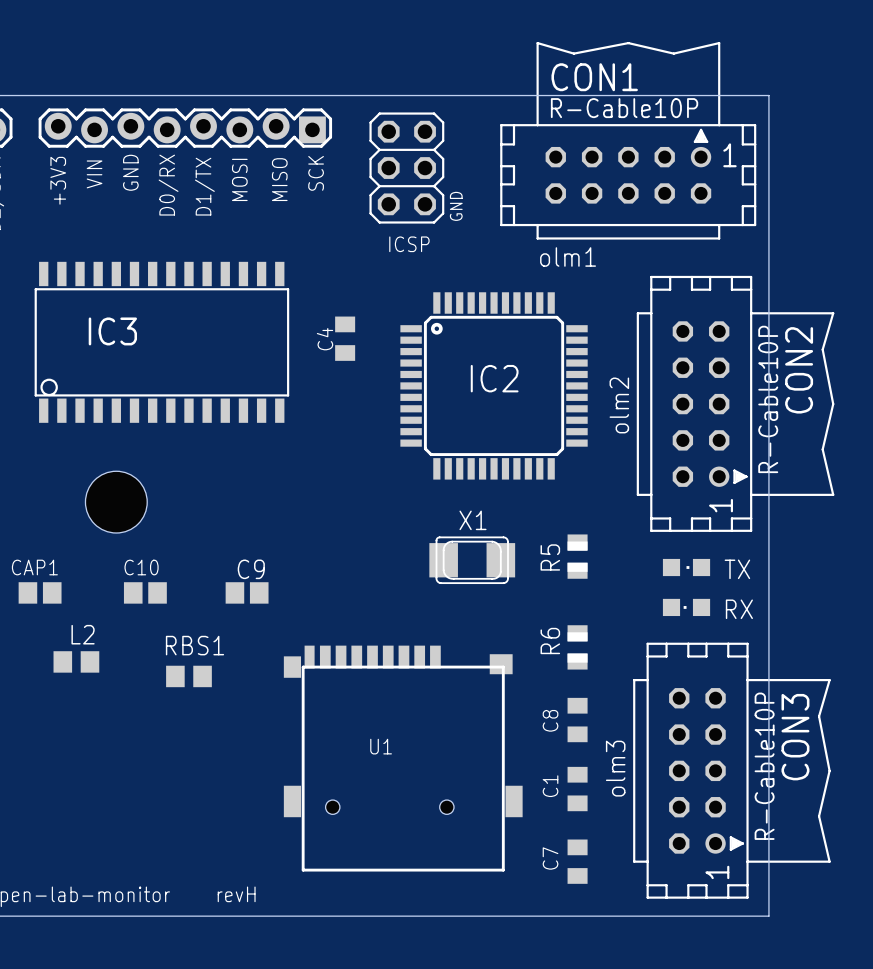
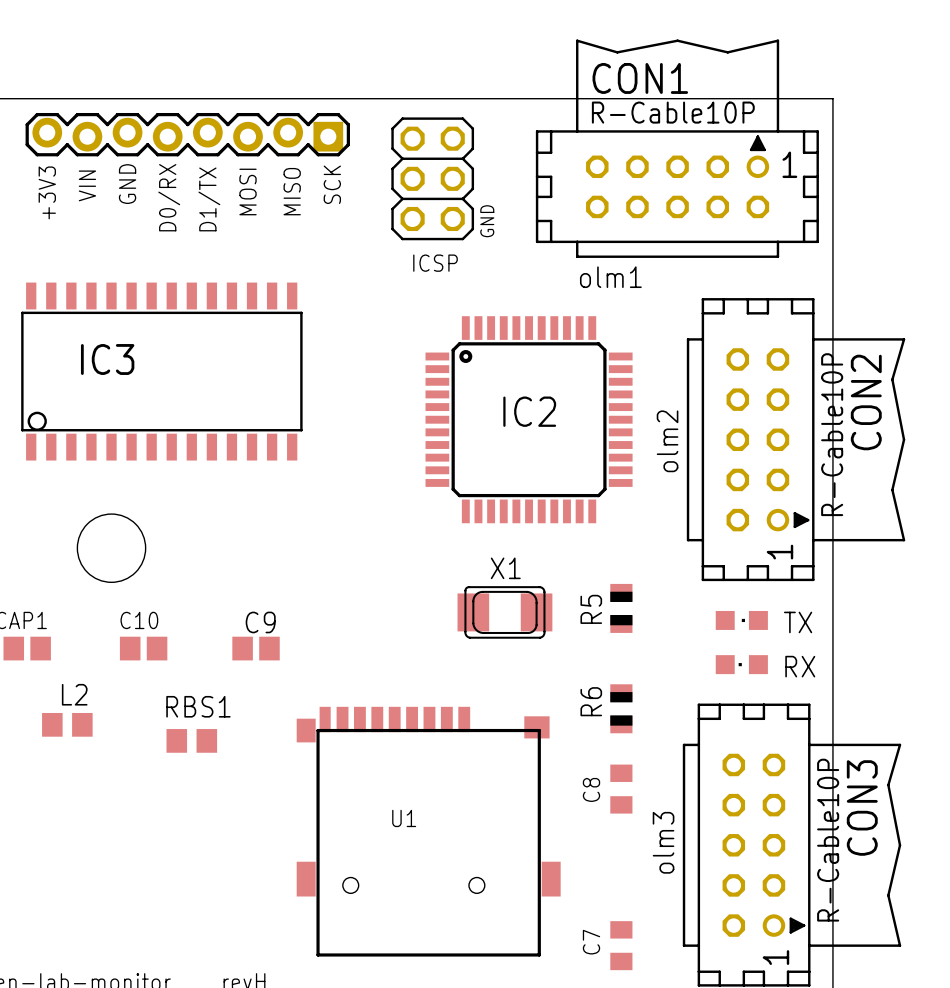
C4: (345, 338) -> none
C1: (577, 789) -> none

